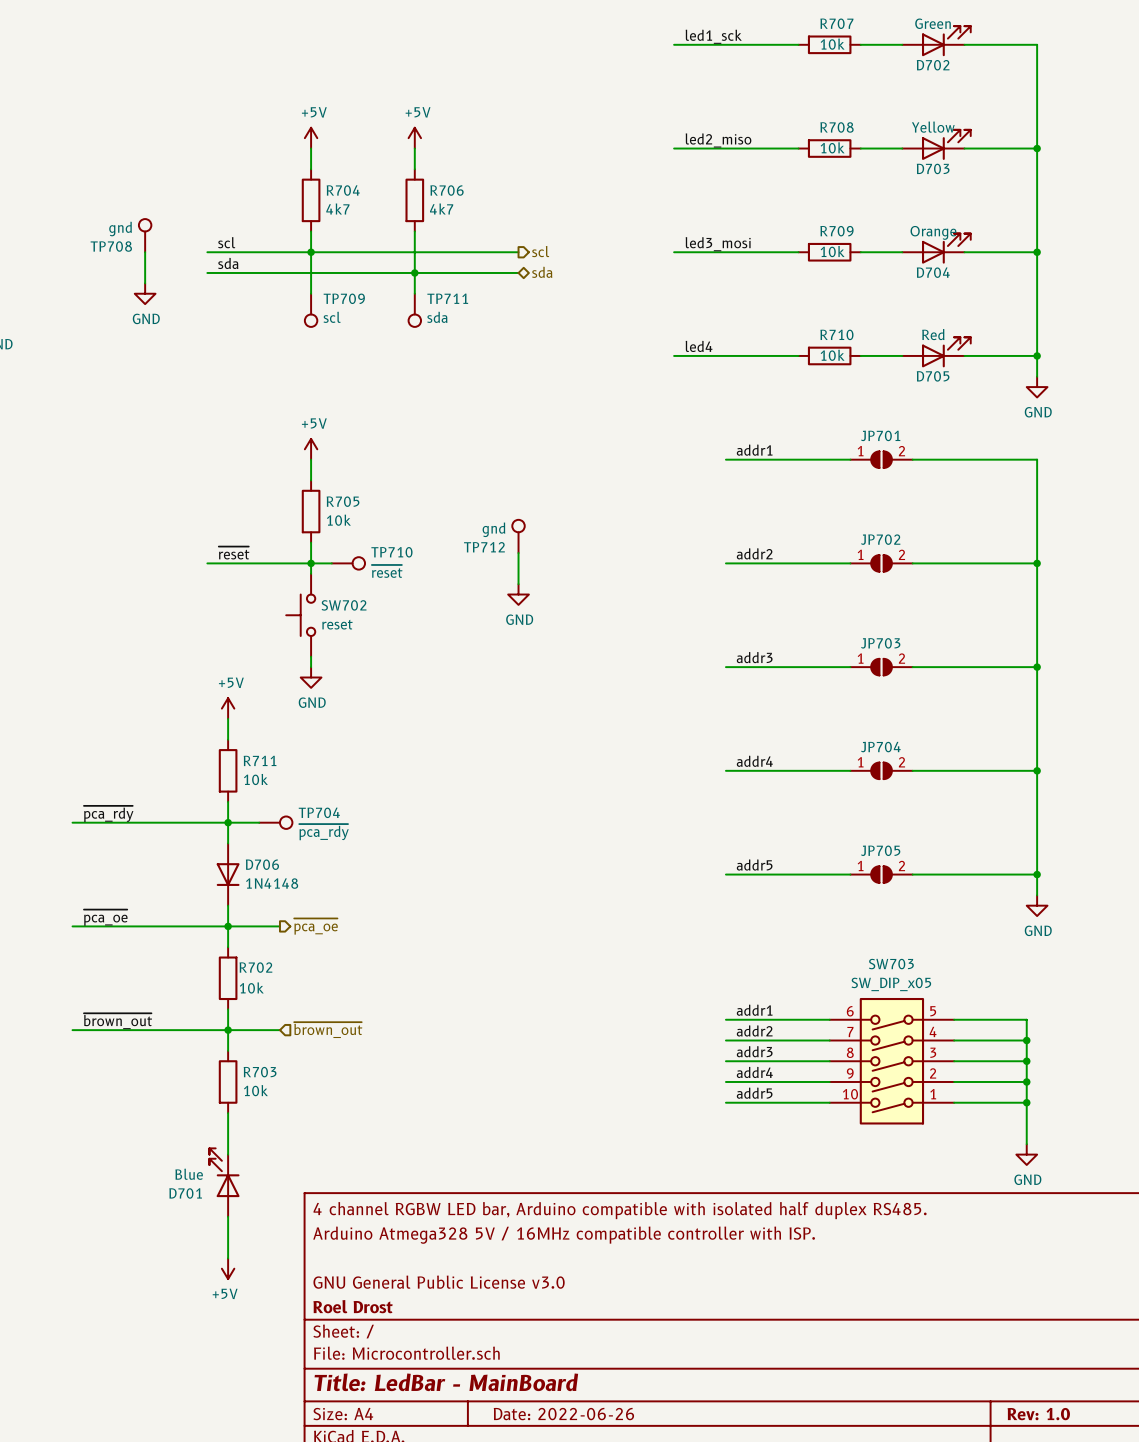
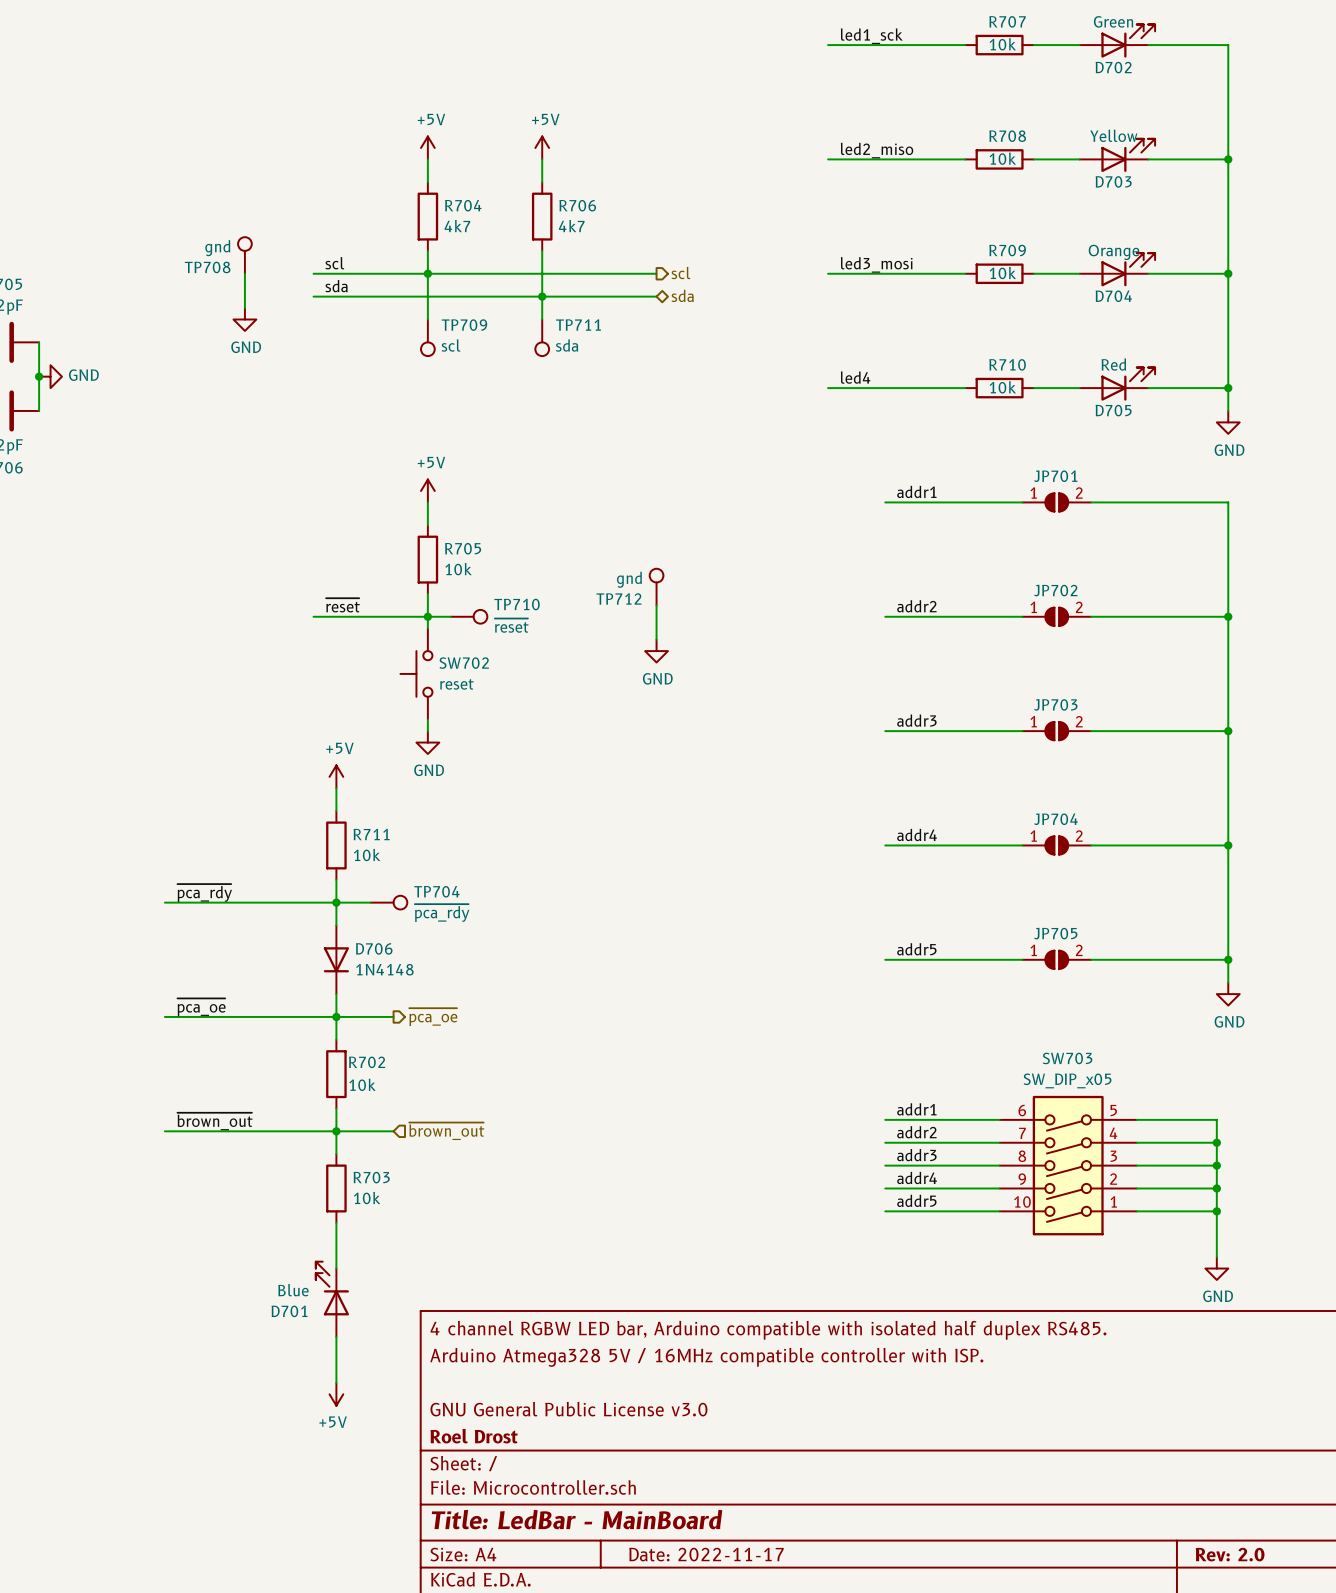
title block: Date: 2022-06-26 (563, 1414) -> Date: 2022-11-17 (706, 1554)
title block: Rev: 1.0 (1038, 1414) -> Rev: 2.0 (1230, 1554)

